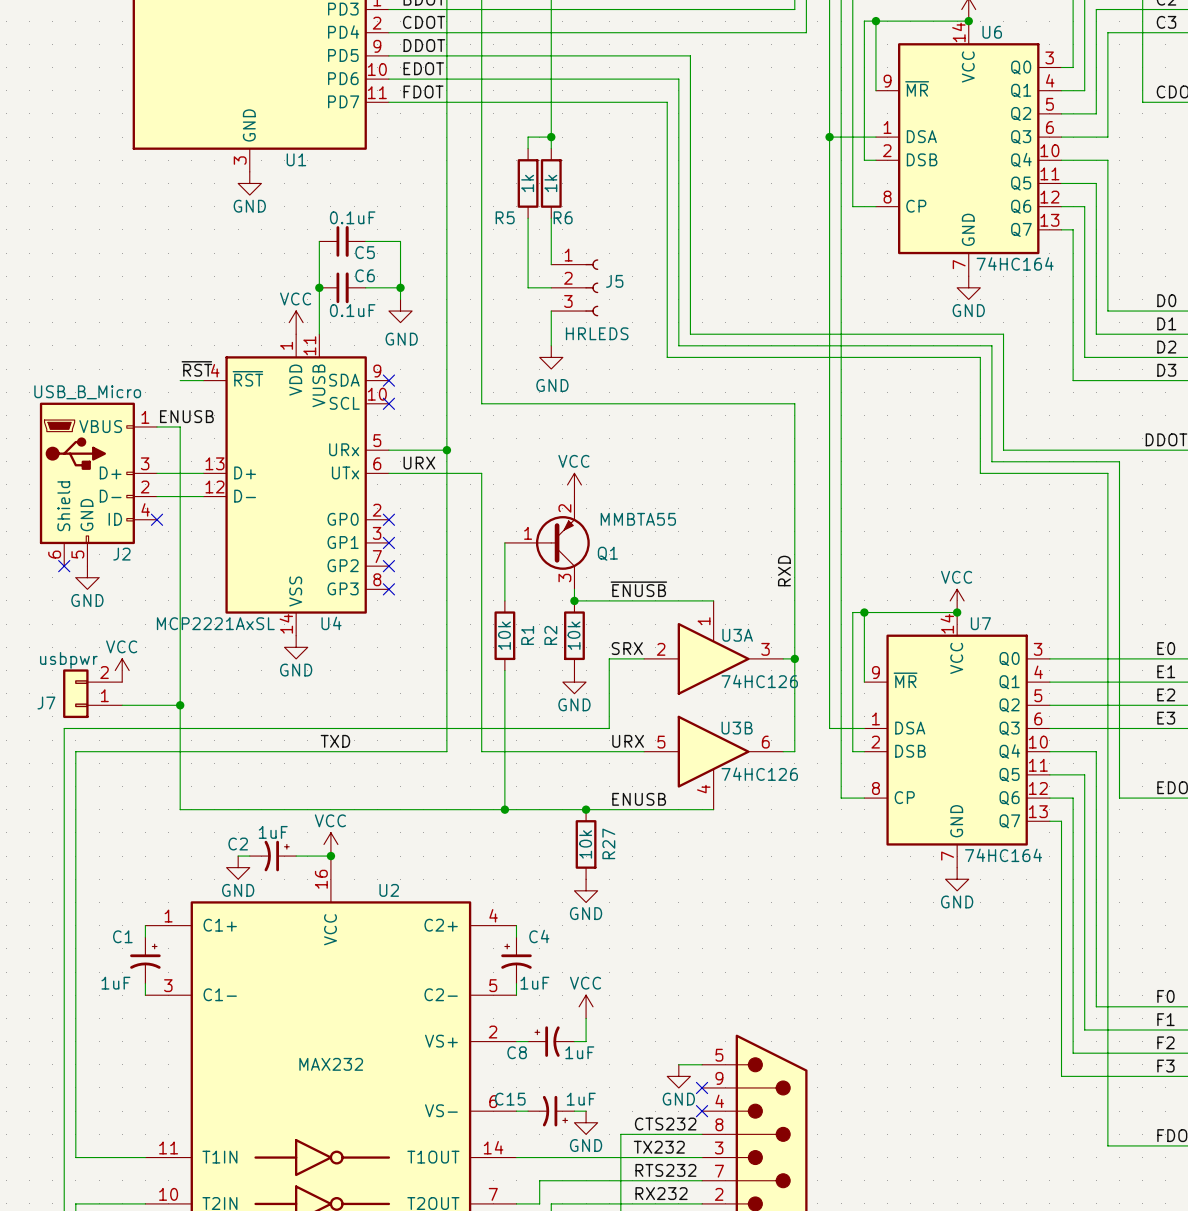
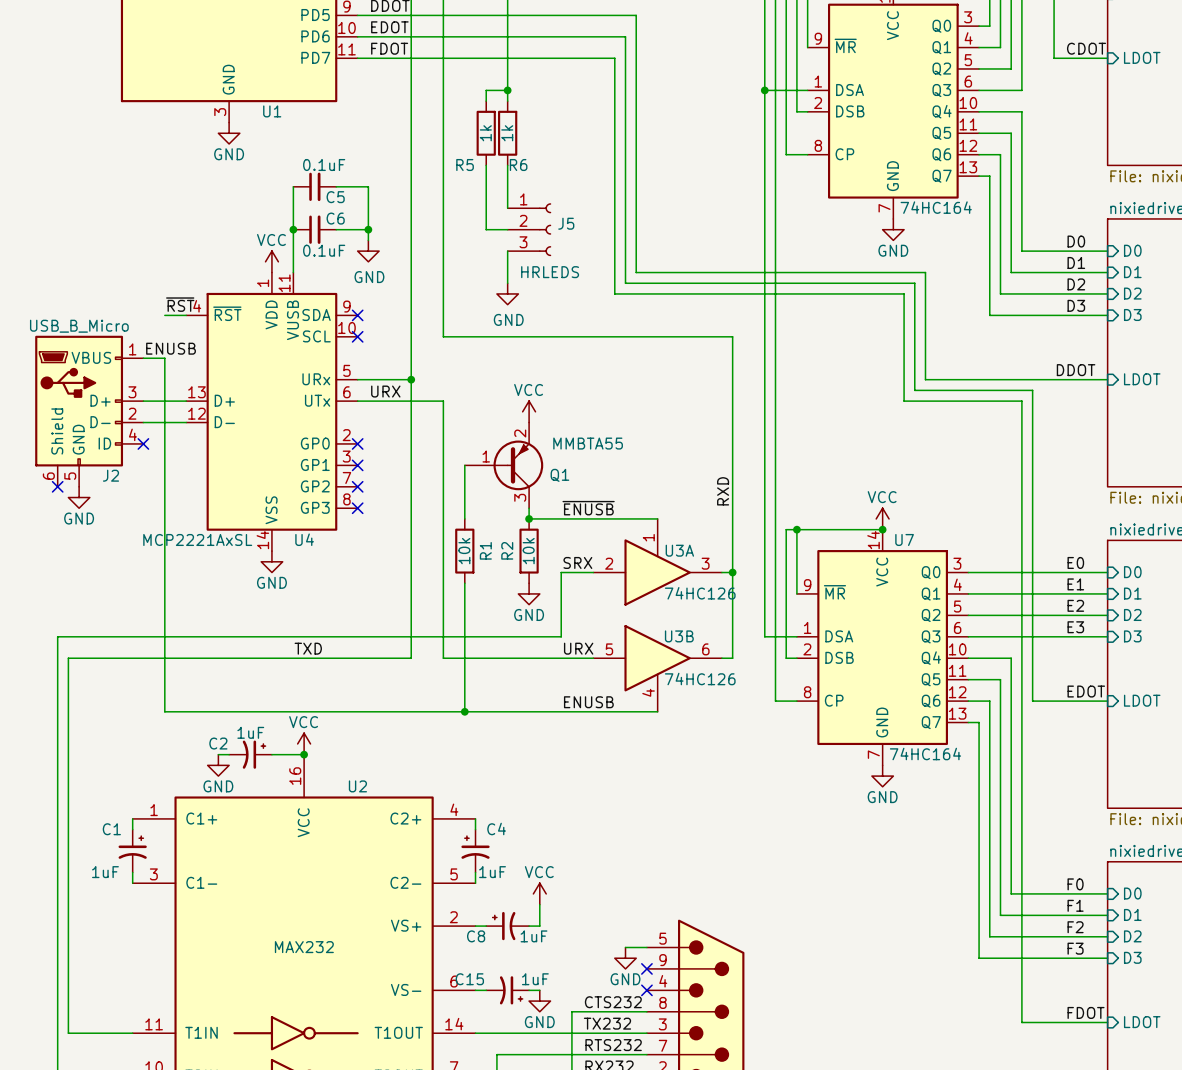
power symbol: VCC (122, 670) -> none
J7: usbpwr (92, 693) -> none
wire: (122, 705) (180, 705) -> none
junction: (180, 705) -> none
junction: (586, 809) -> none
R27: 10k (586, 844) -> none
power symbol: GND (586, 890) -> none

